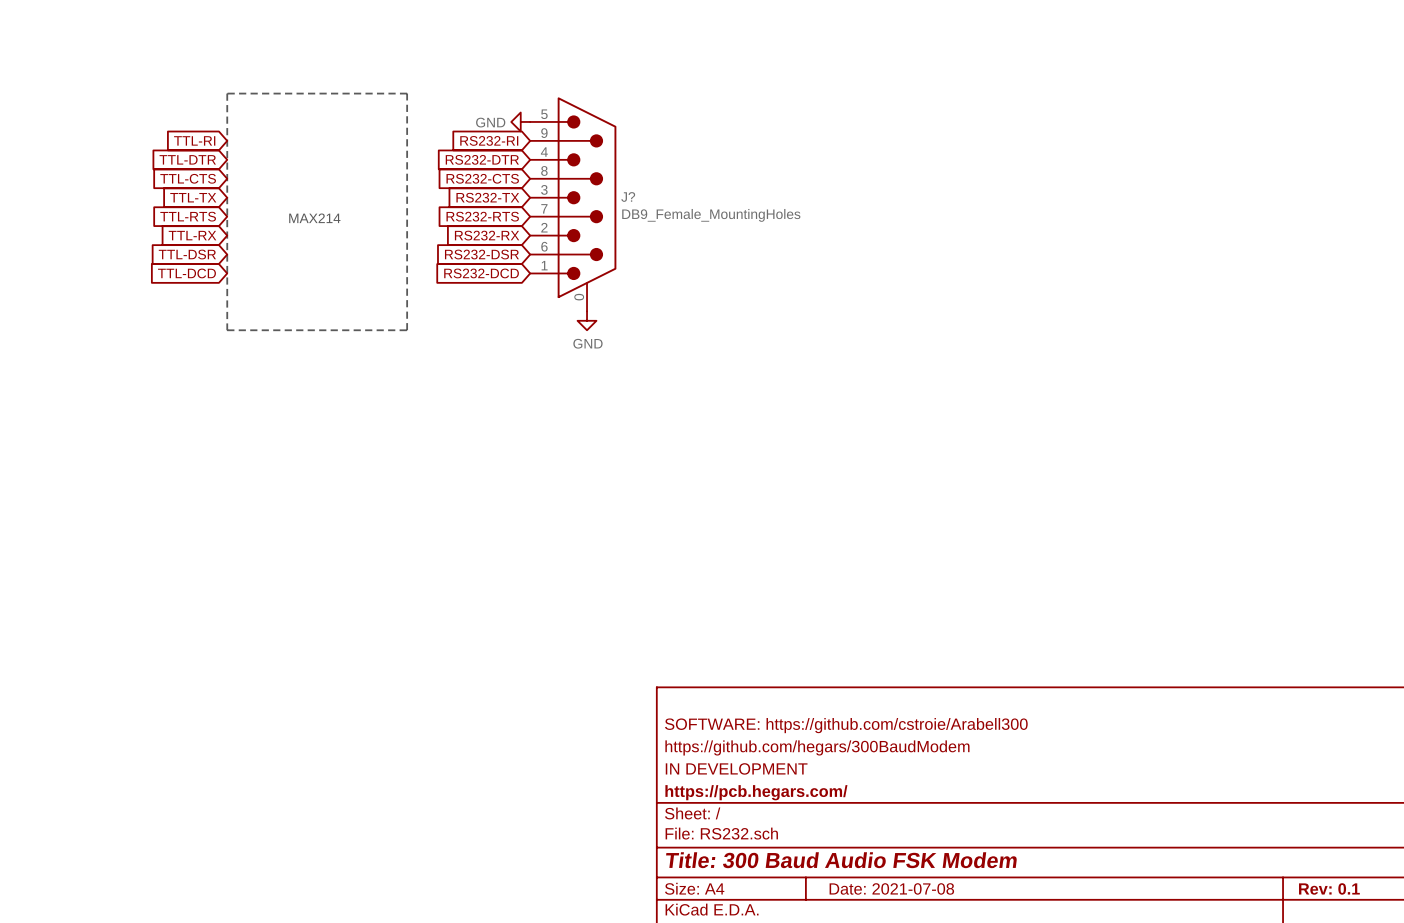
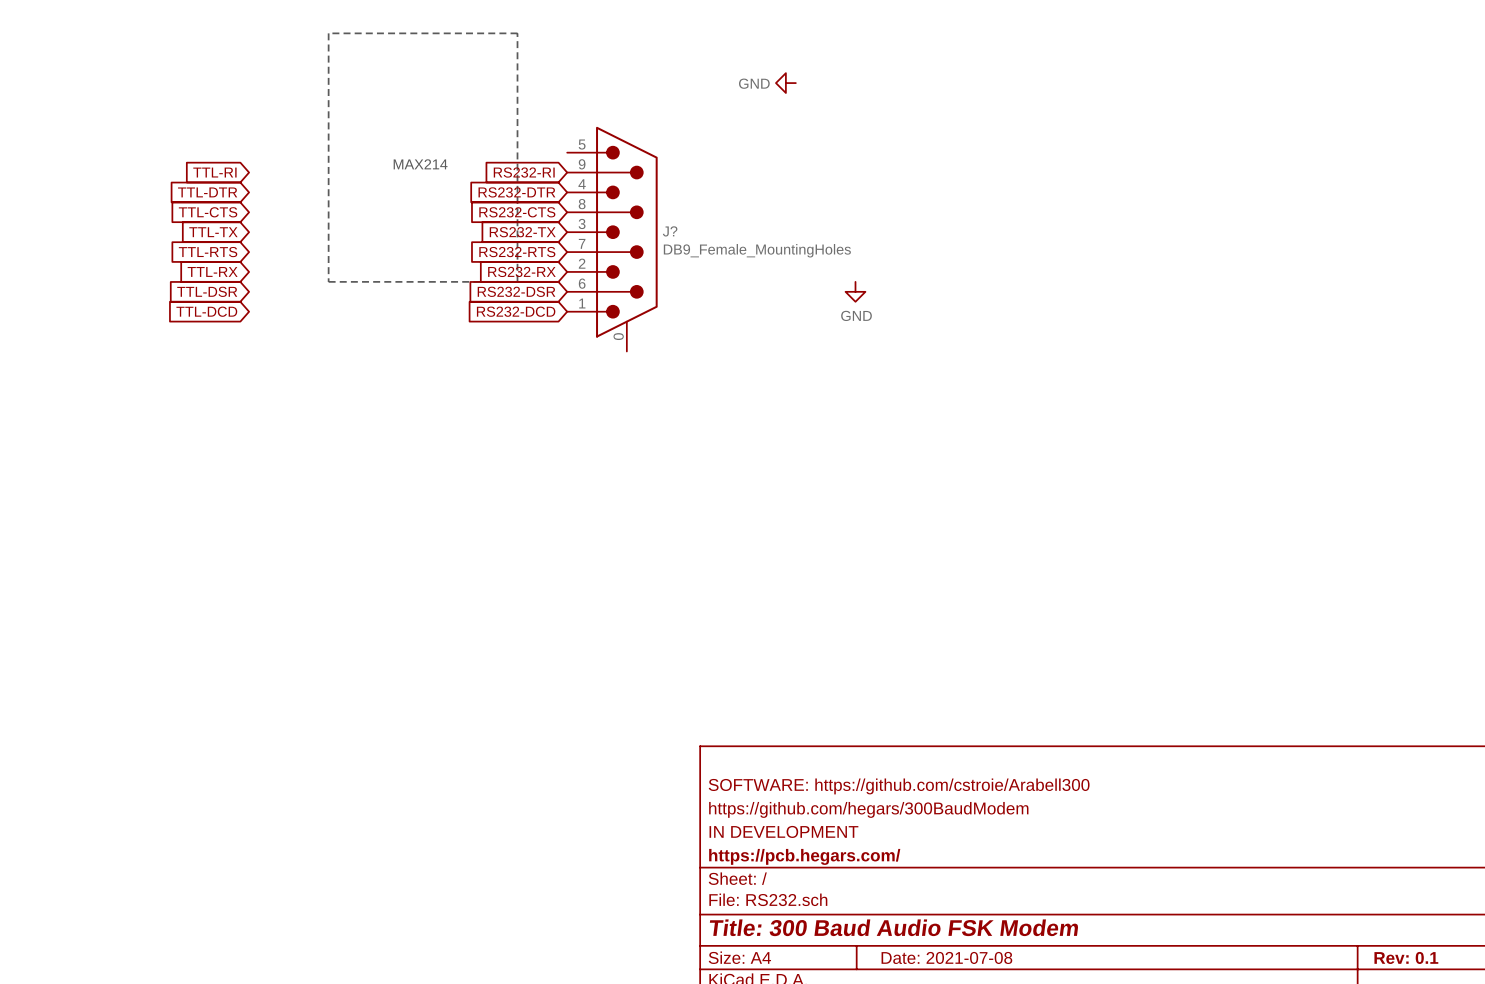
power symbol: none -> GND (785, 83)
line: (227, 93) (227, 330) (407, 330) (407, 93) (227, 93) -> (328, 33) (328, 281) (517, 281) (517, 33) (328, 33)
power symbol: GND (520, 121) -> none
text position: MAX214 (314, 218) -> MAX214 (420, 164)
power symbol: none -> GND (855, 291)
power symbol: GND (587, 320) -> none

